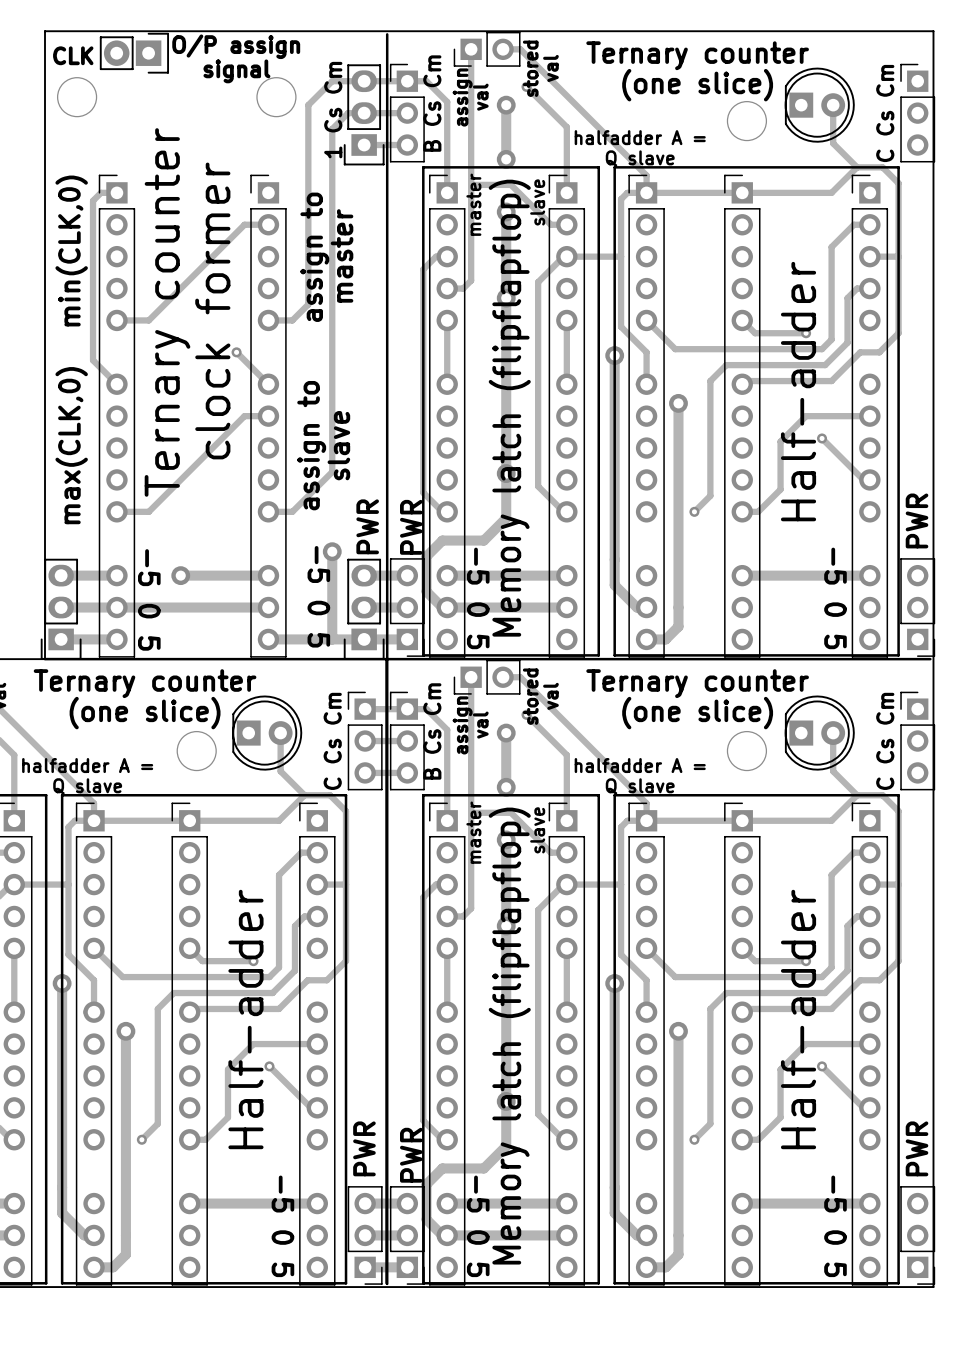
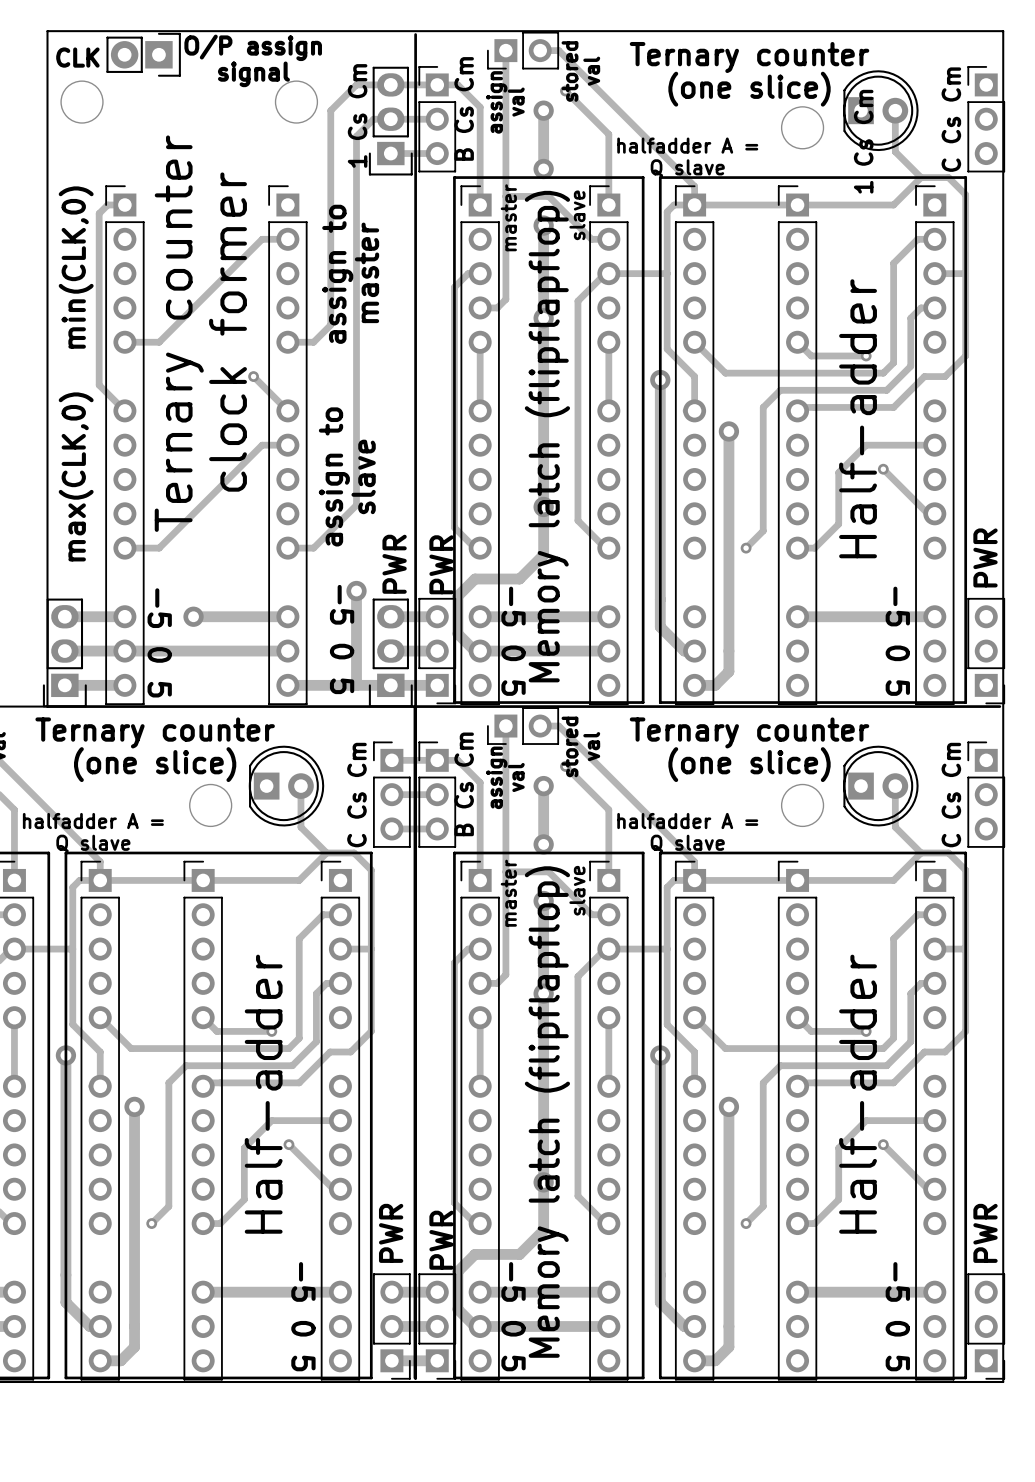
text: none -> 1 Cs Cm (863, 141)

